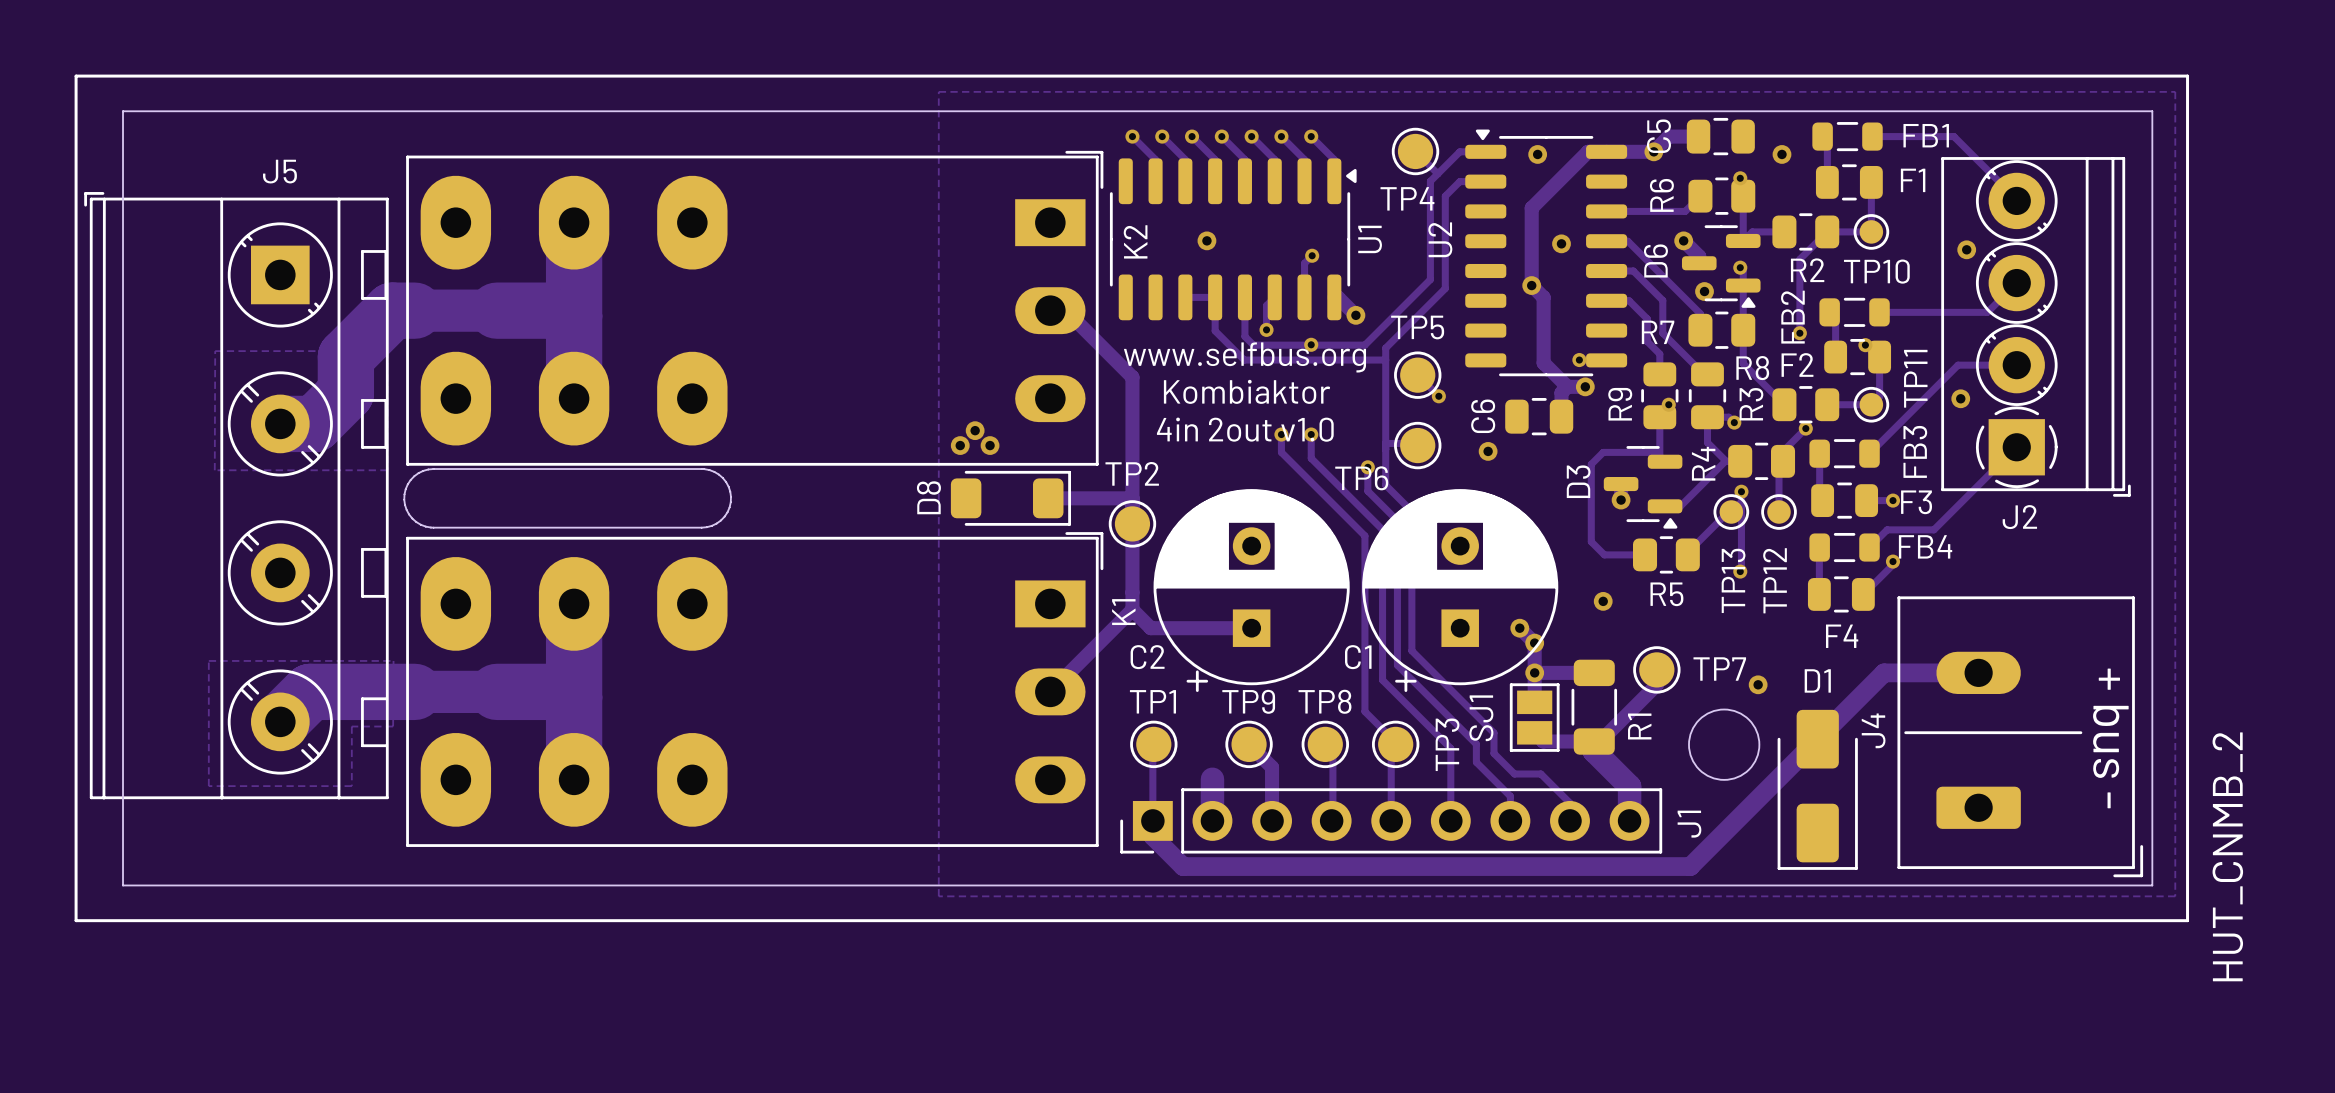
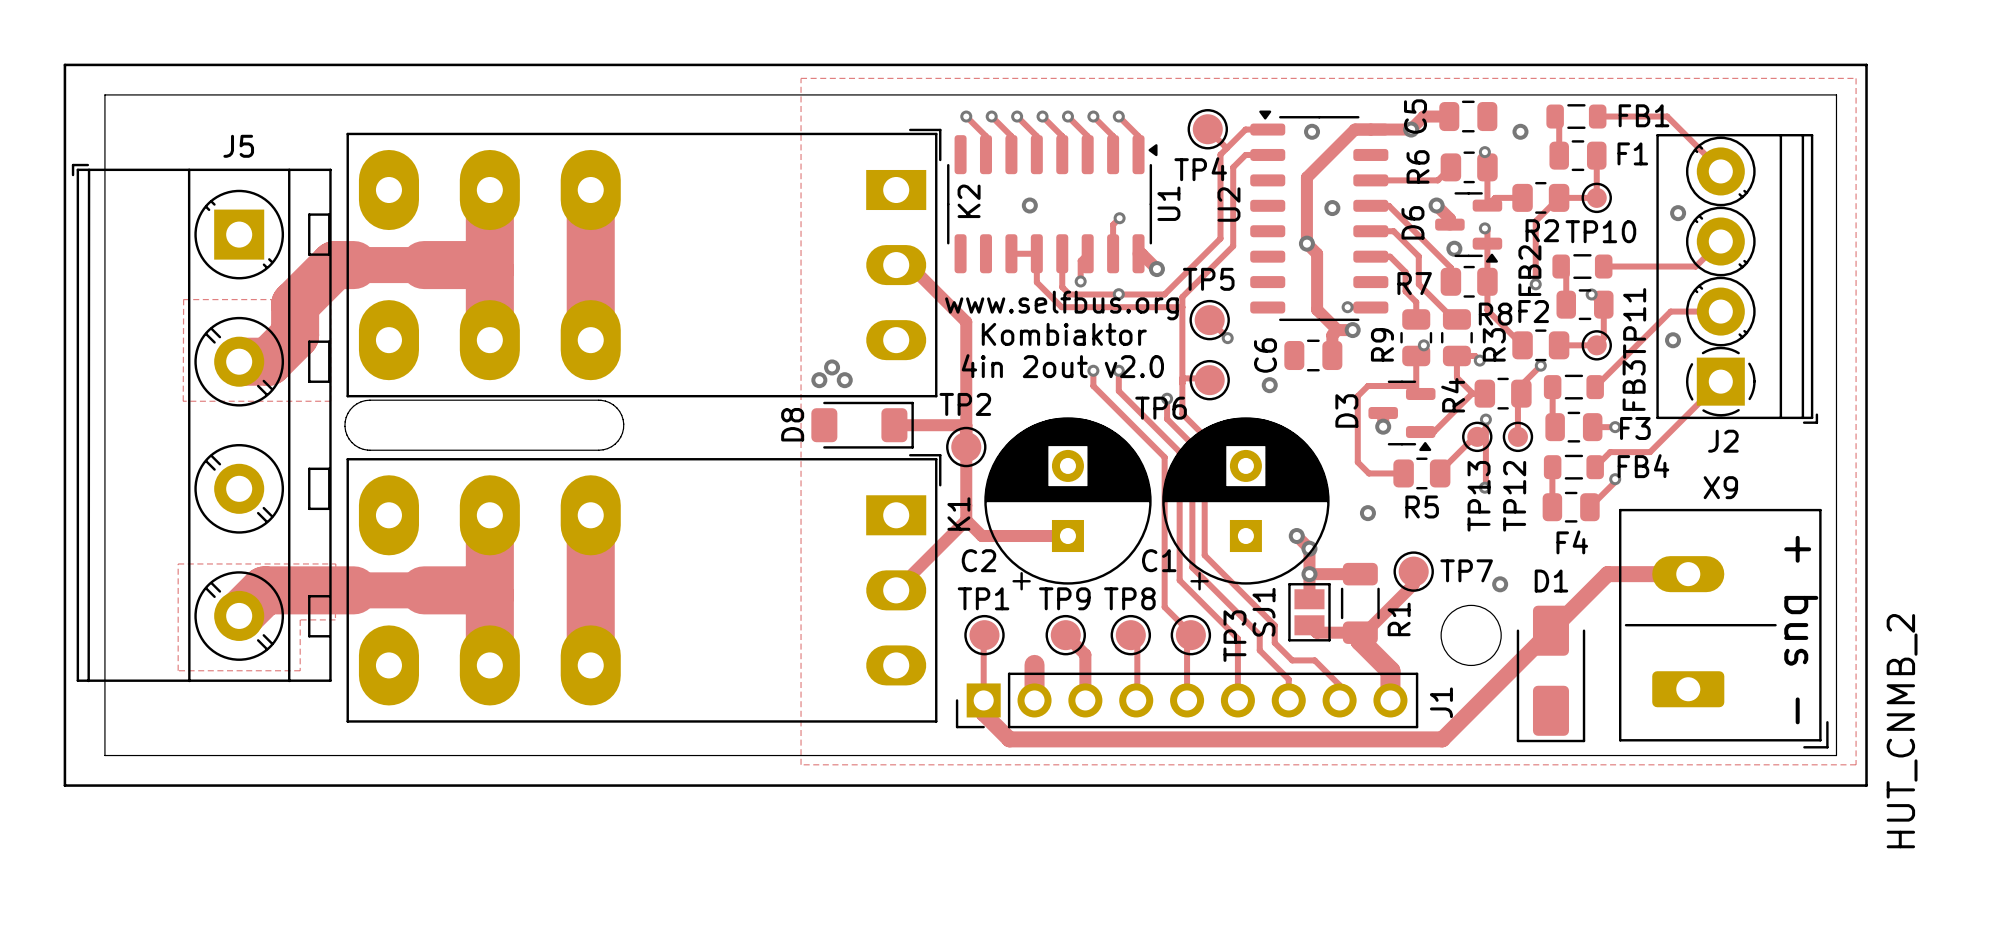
track: none -> (590, 190) (590, 340)
text: 4in 2out v1.0 (1245, 429) -> 4in 2out v2.0 (1062, 366)
track: none -> (590, 515) (590, 665)
J4 name: J4 (1873, 730) -> X9 (1720, 487)

